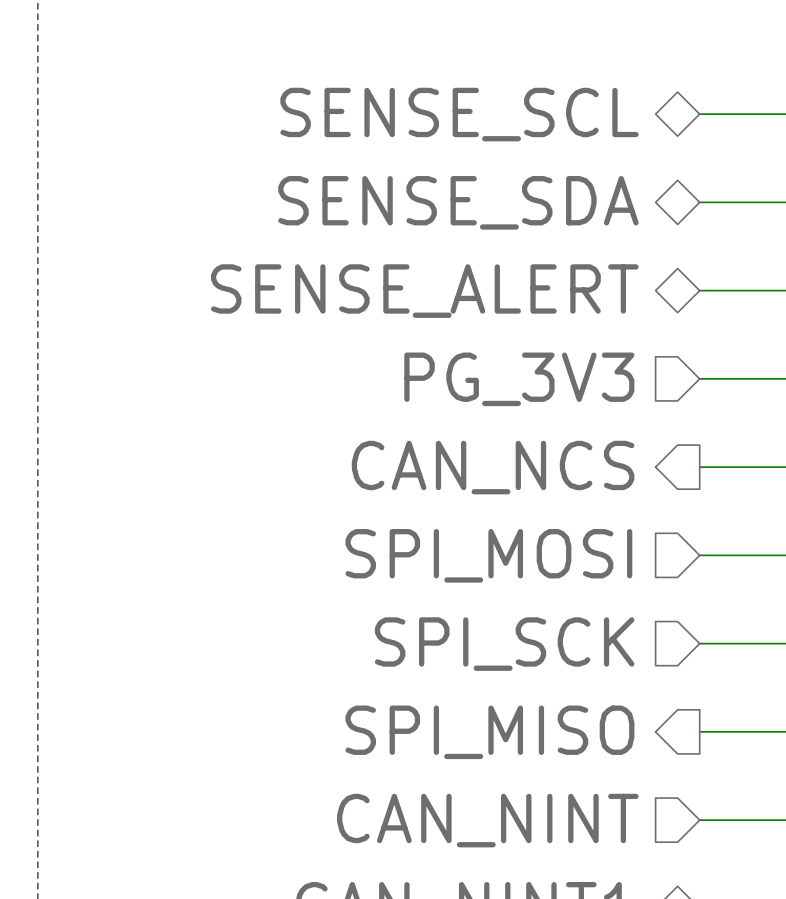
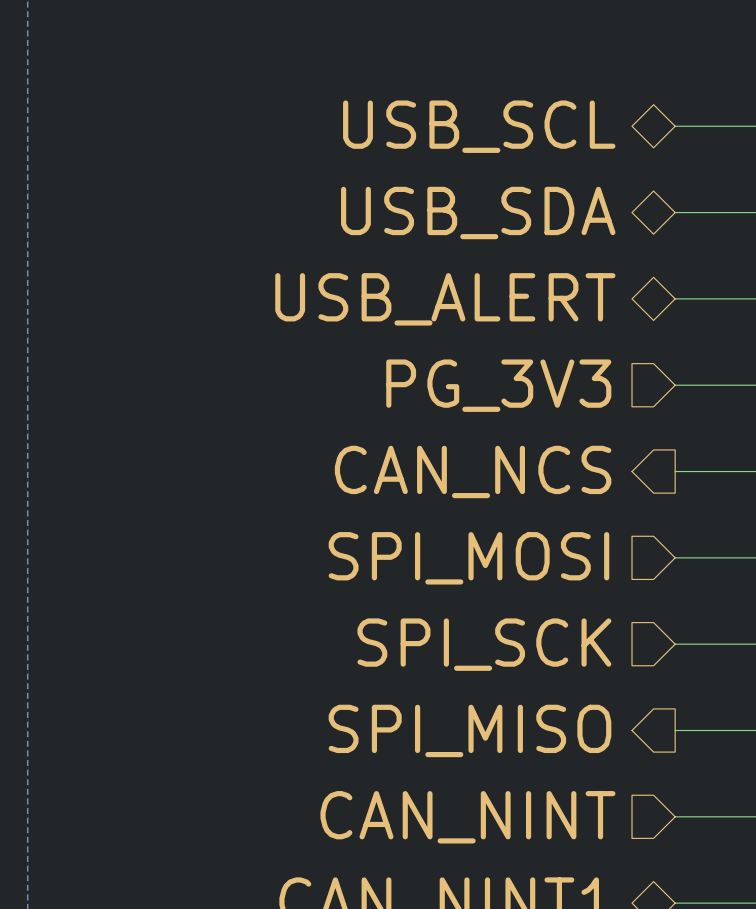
hierarchical label: SENSE_SCL (459, 114) -> USB_SCL (479, 126)
hierarchical label: SENSE_SDA (458, 202) -> USB_SDA (478, 213)
hierarchical label: SENSE_ALERT (424, 291) -> USB_ALERT (445, 299)

